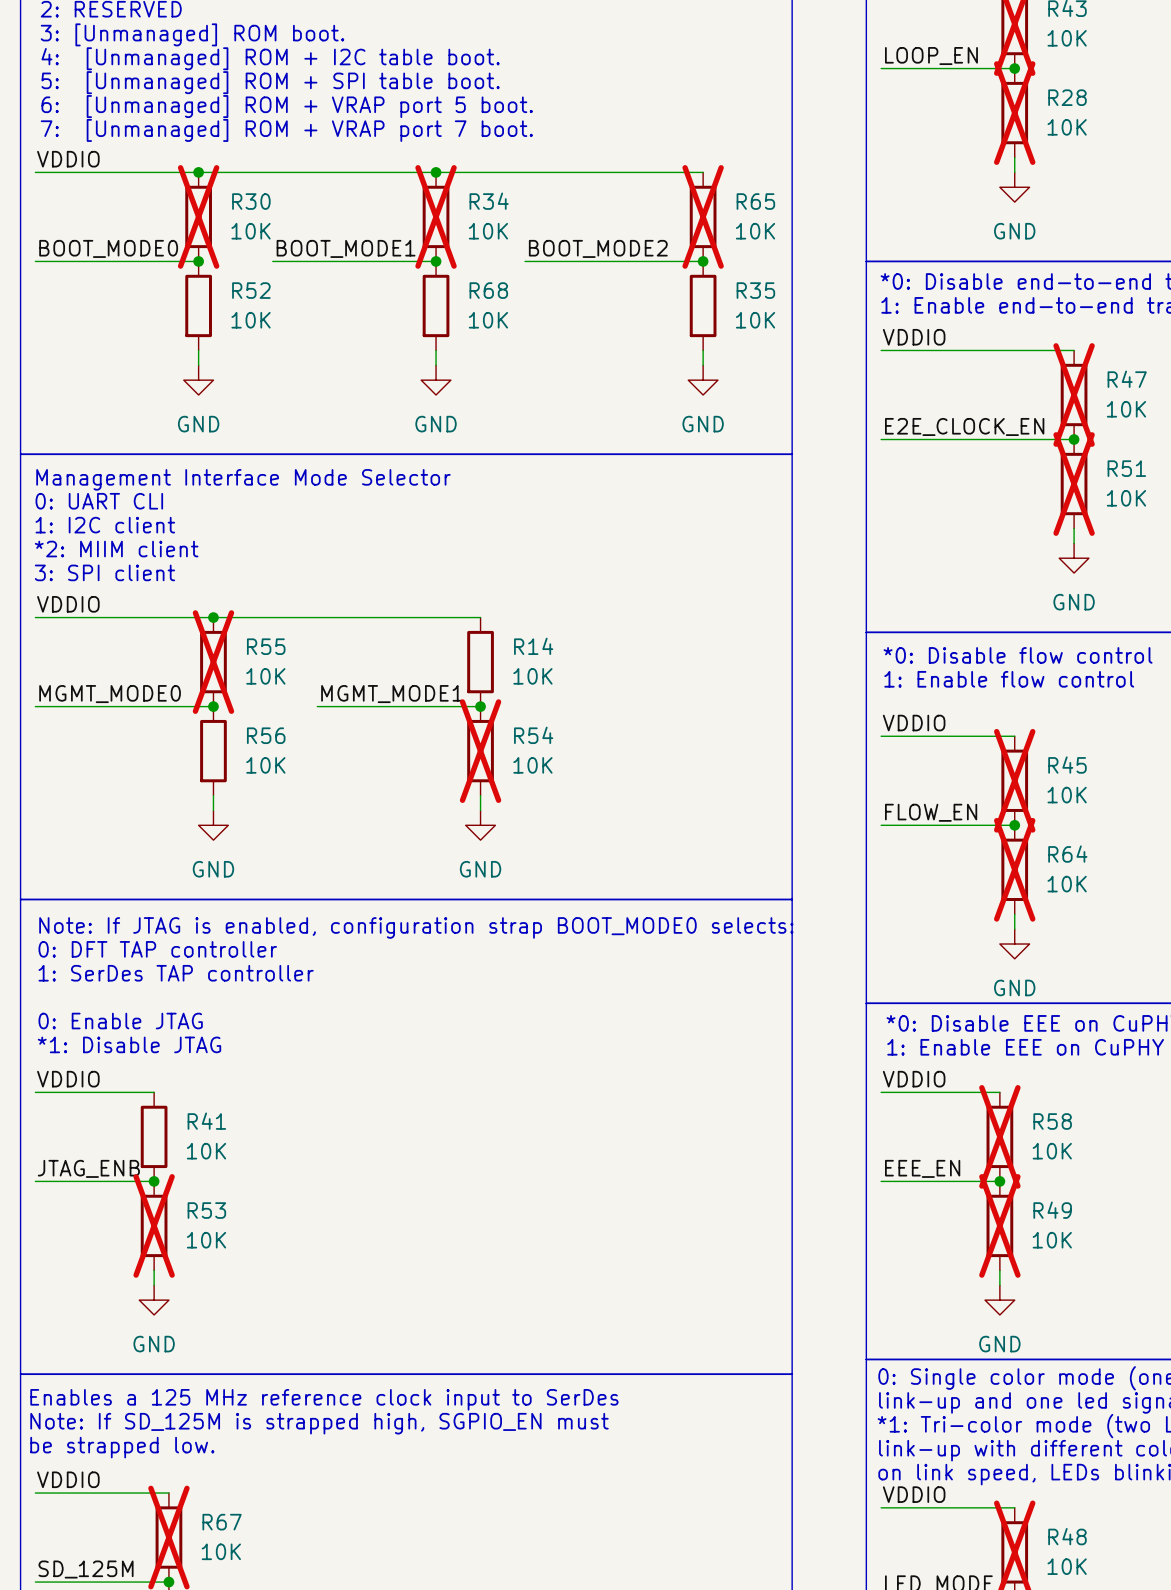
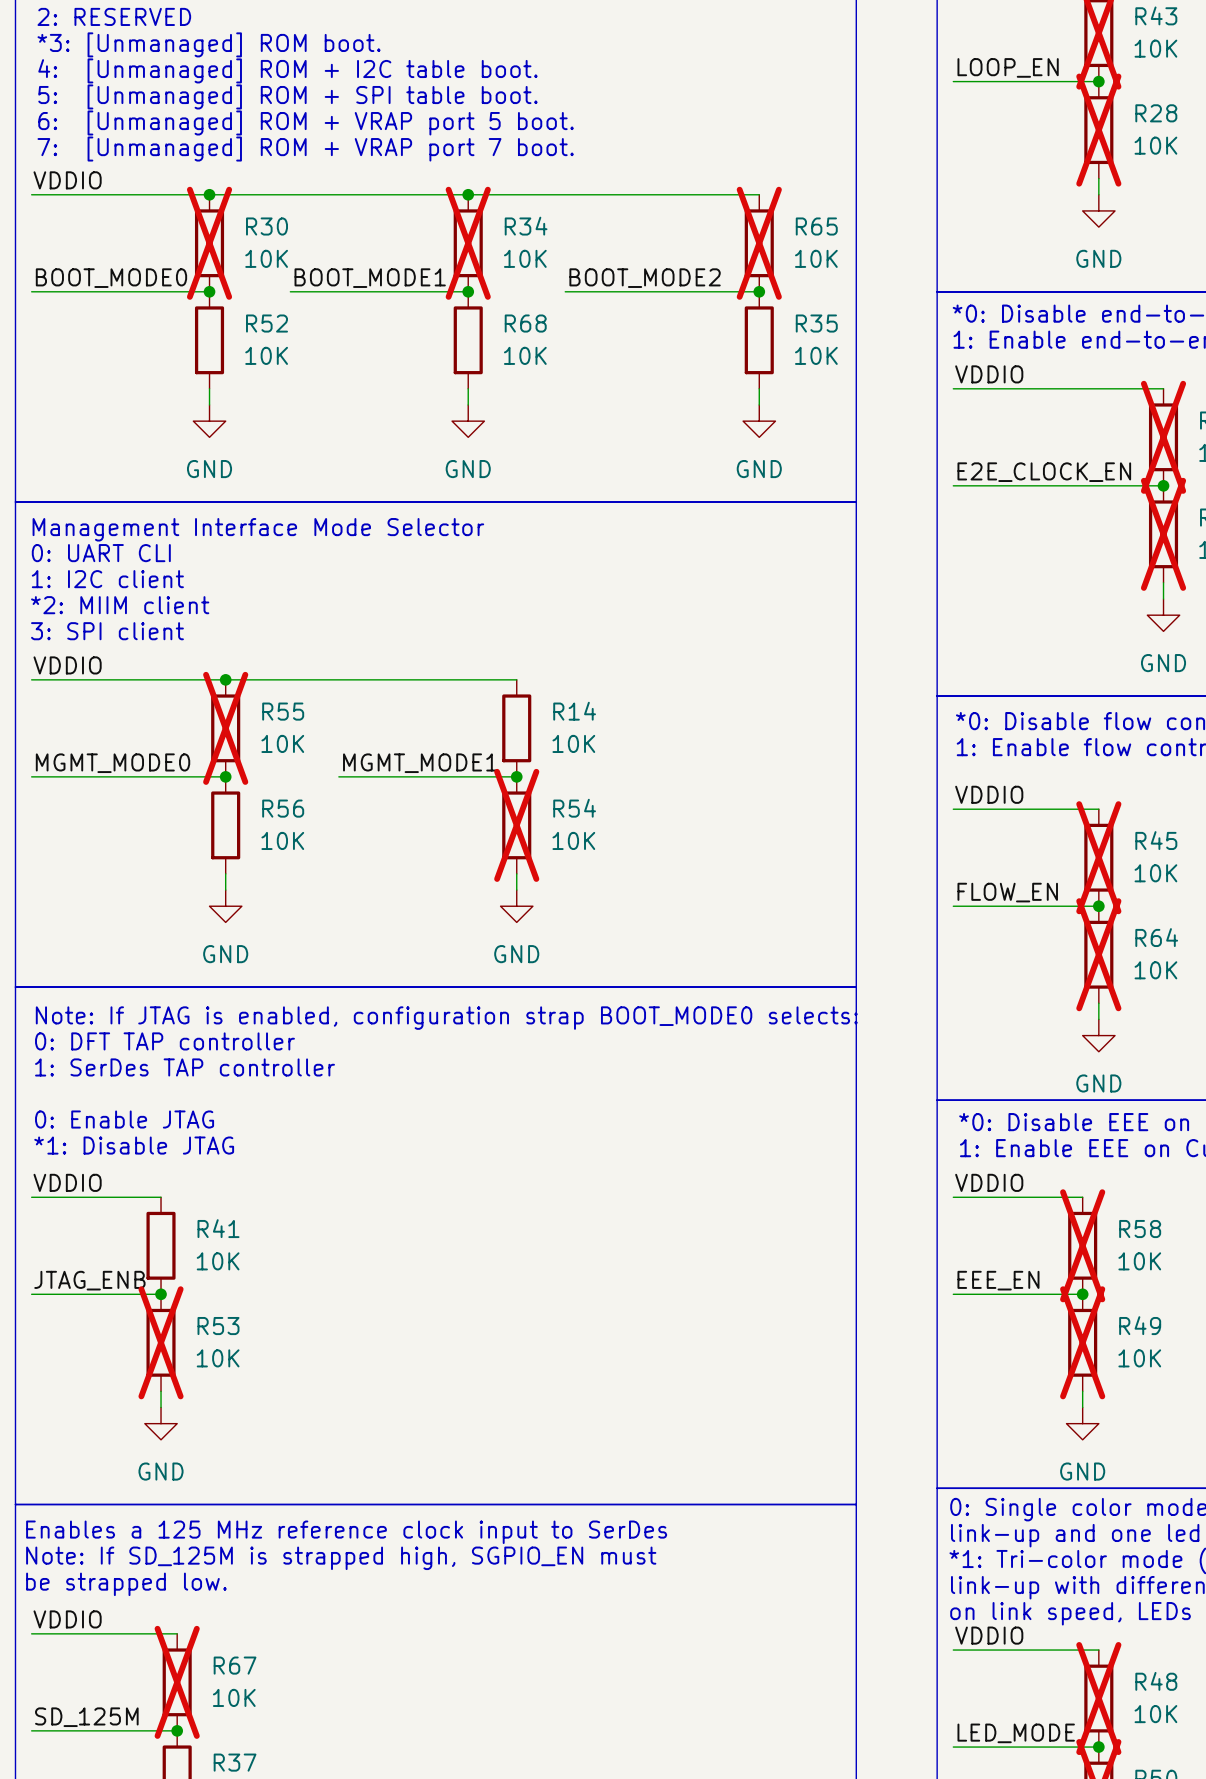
text: 3: [Unmanaged] ROM boot. (192, 34) -> *3: [Unmanaged] ROM boot. (209, 44)

